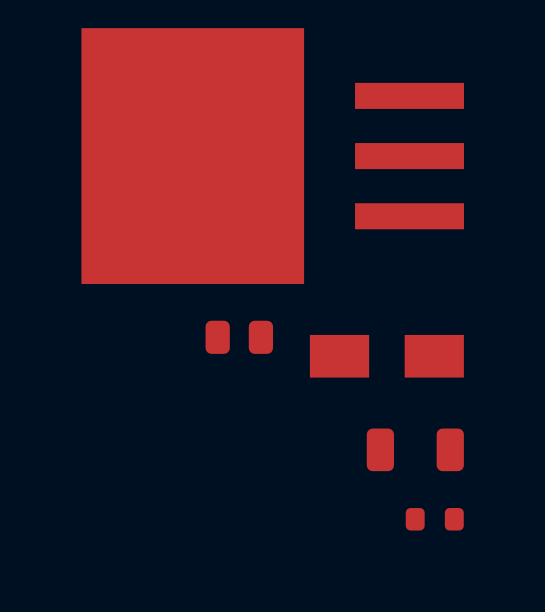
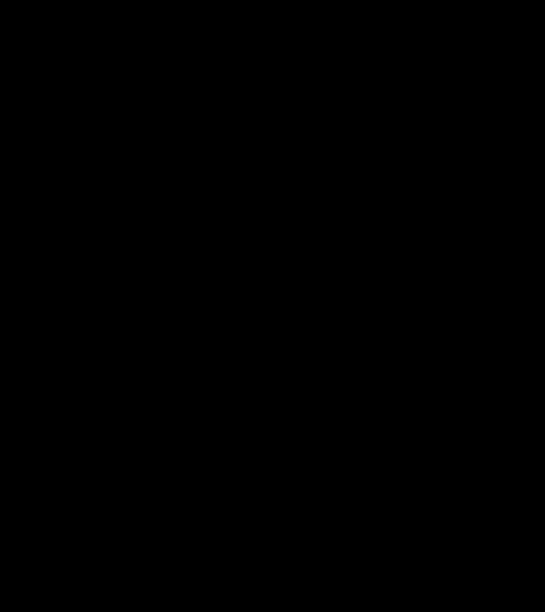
part: (272, 156) -> none
part: (239, 337) -> none
part: (386, 356) -> none
part: (415, 449) -> none
part: (434, 519) -> none

